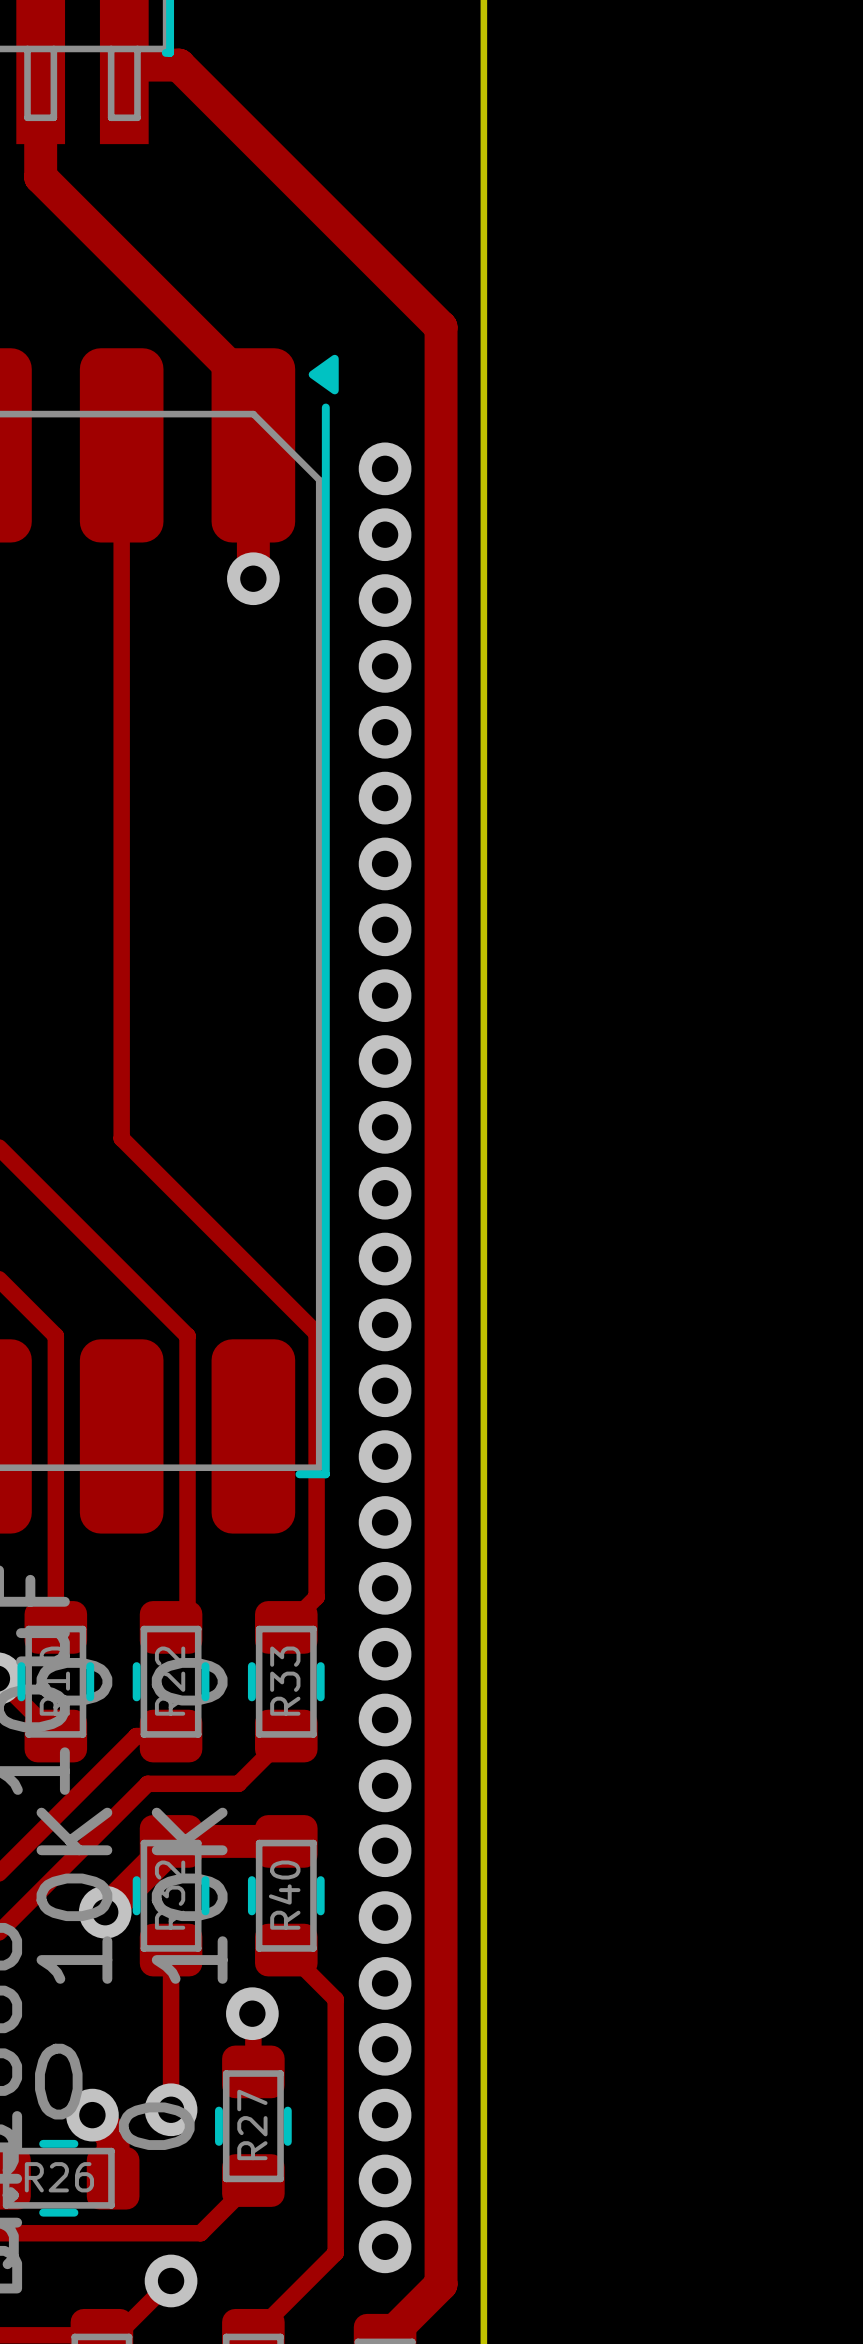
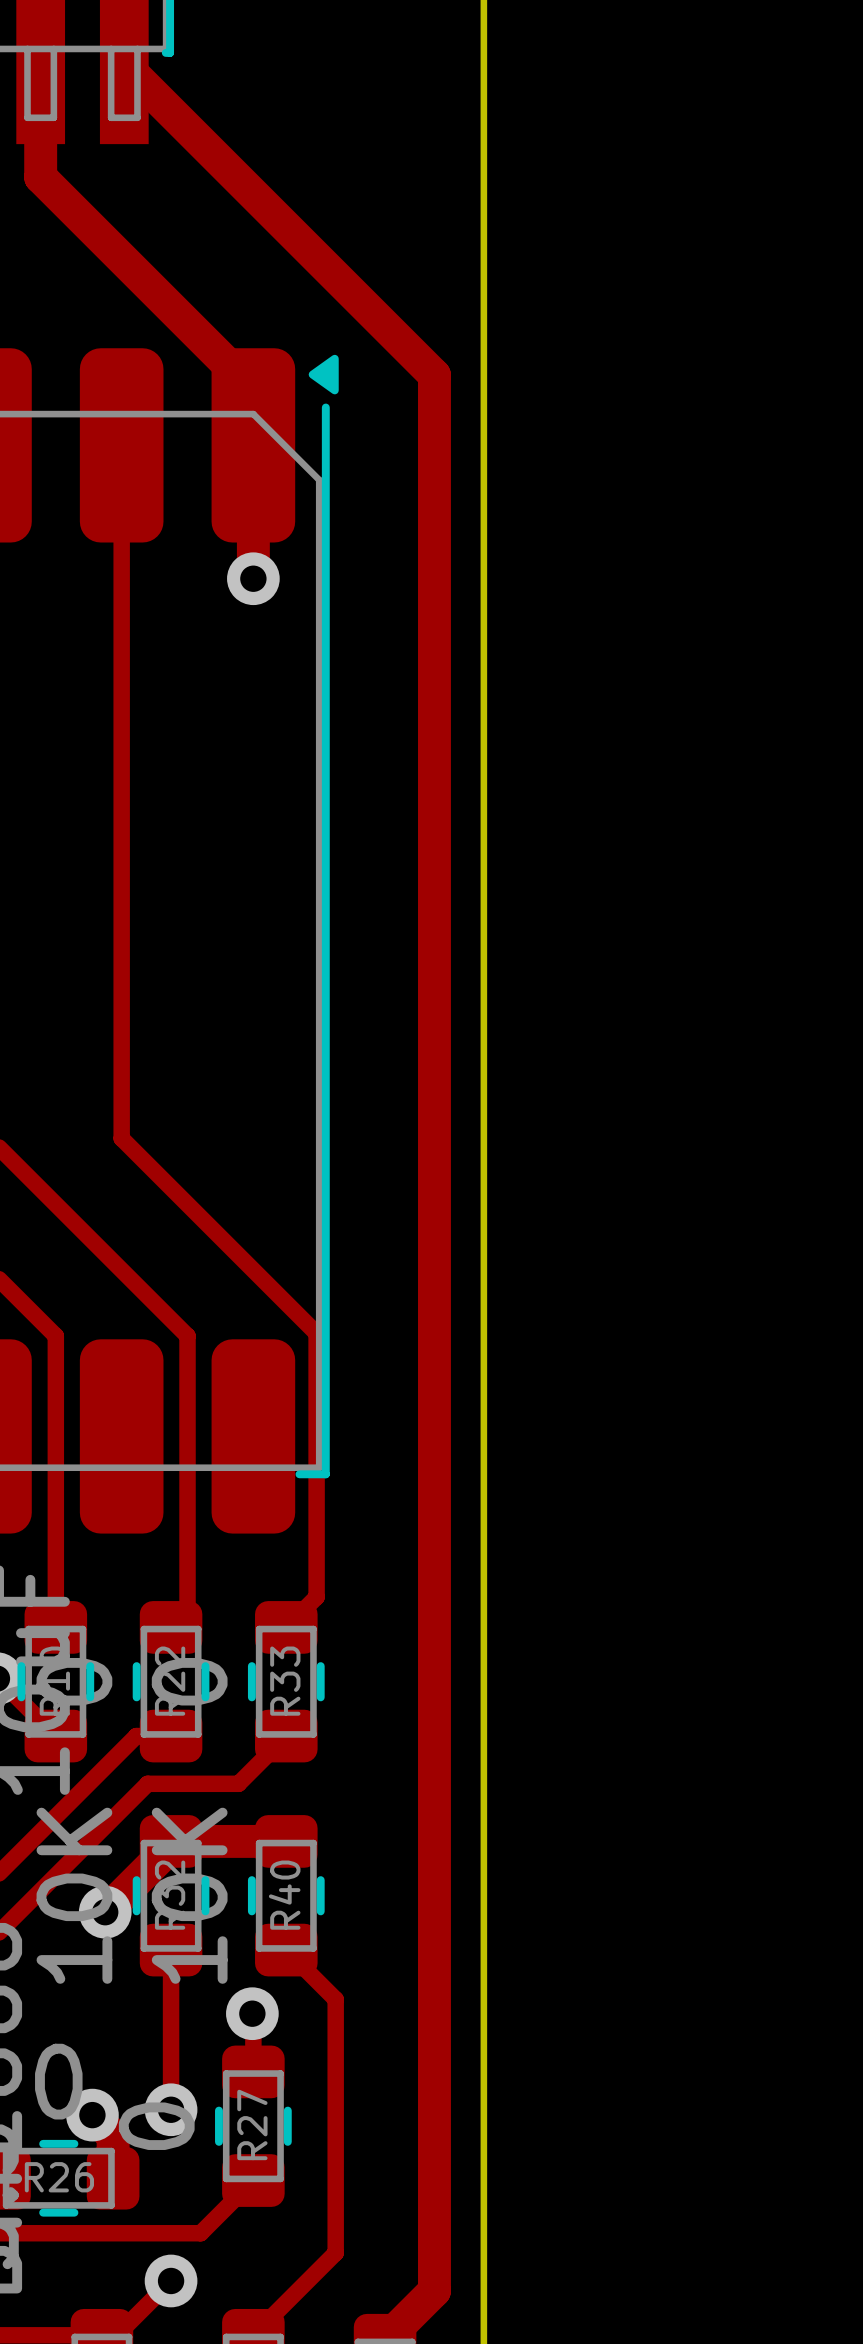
track: (124, 65) (178, 65) (441, 327) (441, 2284) (434, 2290) -> (124, 65) (434, 375) (434, 2290)
via: (385, 468) -> none
via: (385, 534) -> none
via: (385, 600) -> none
via: (385, 666) -> none
via: (385, 732) -> none
via: (385, 798) -> none
via: (385, 863) -> none
via: (385, 929) -> none
via: (385, 995) -> none
via: (385, 1061) -> none
via: (385, 1127) -> none
via: (385, 1193) -> none
via: (385, 1259) -> none
via: (385, 1324) -> none
via: (385, 1390) -> none
via: (385, 1456) -> none
via: (385, 1522) -> none
via: (385, 1588) -> none
via: (385, 1654) -> none
via: (385, 1720) -> none
via: (385, 1785) -> none
via: (385, 1850) -> none
via: (385, 1917) -> none
via: (385, 1983) -> none
via: (385, 2049) -> none
via: (385, 2115) -> none
via: (385, 2180) -> none
via: (385, 2246) -> none

